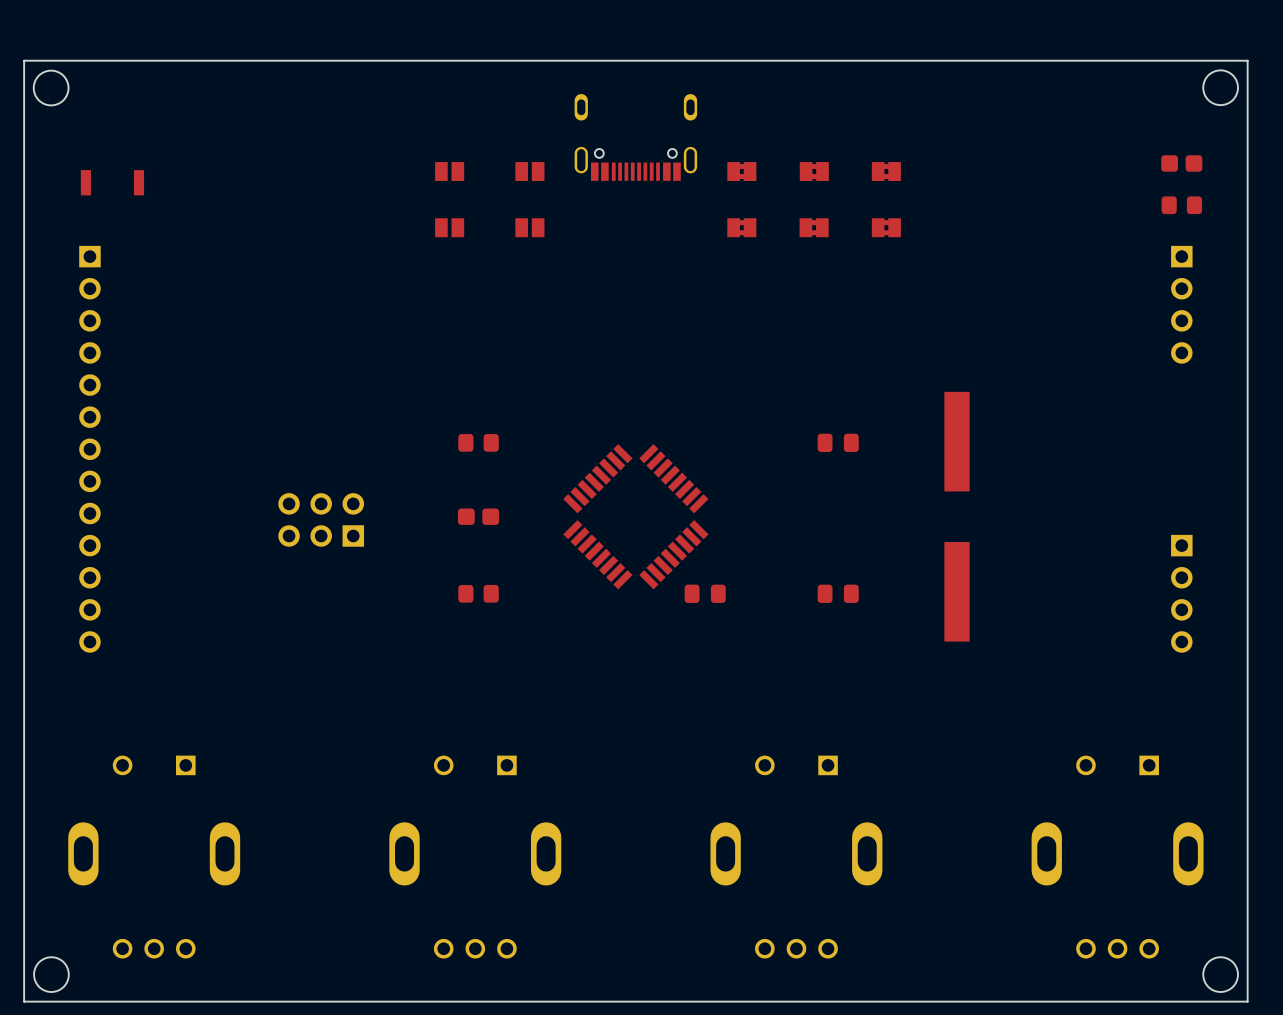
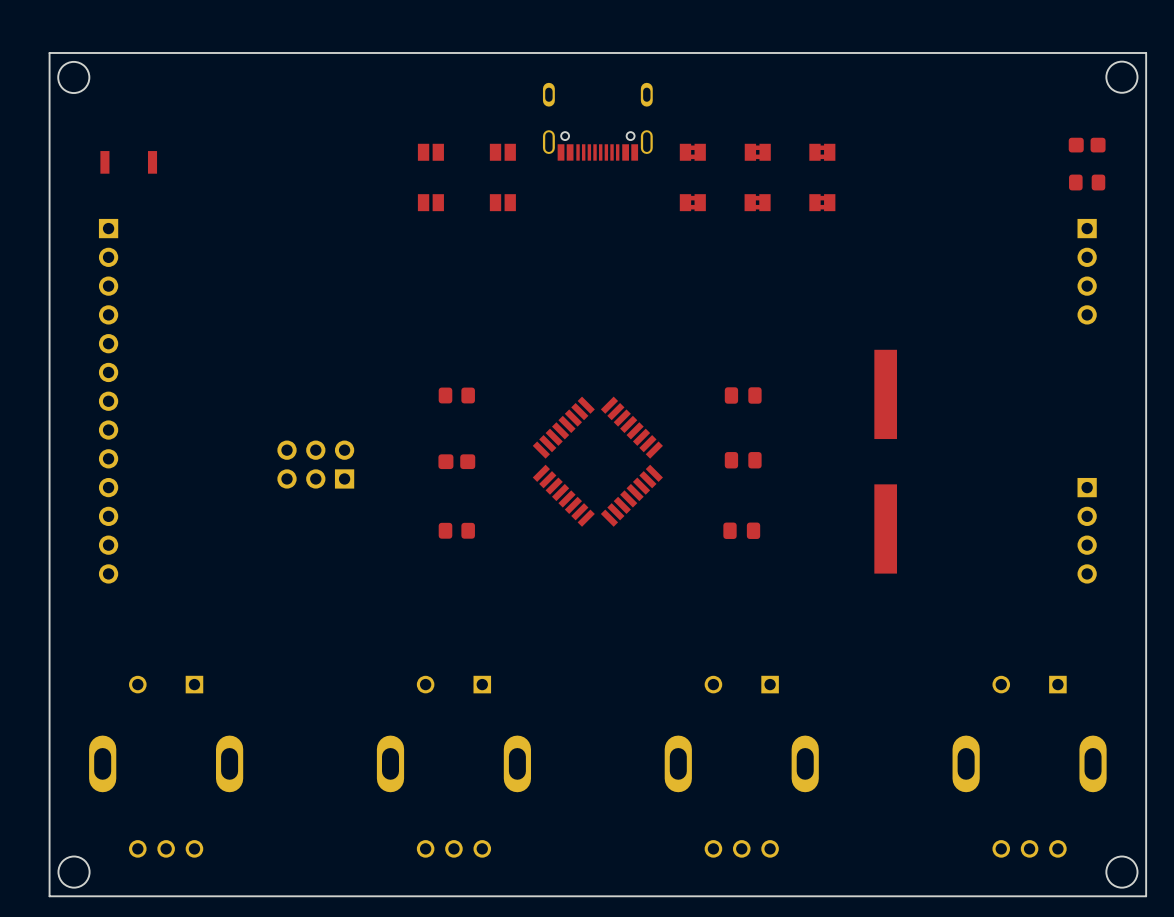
part position: (838, 442) -> (743, 395)
part: none -> (743, 460)
part: (705, 593) -> none
part position: (838, 593) -> (741, 530)

